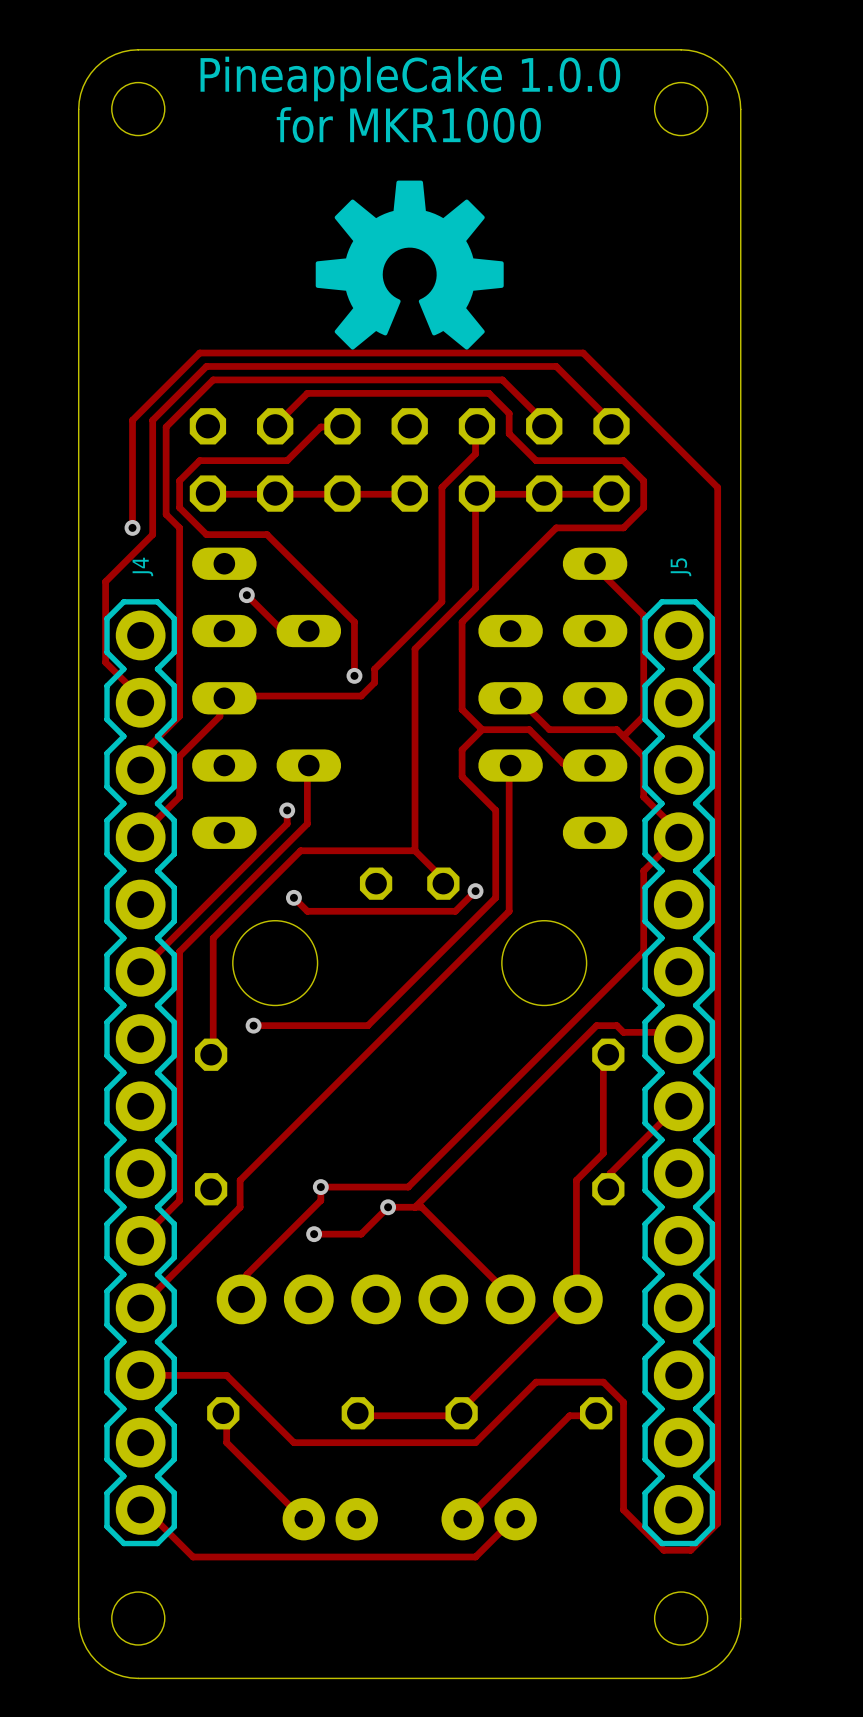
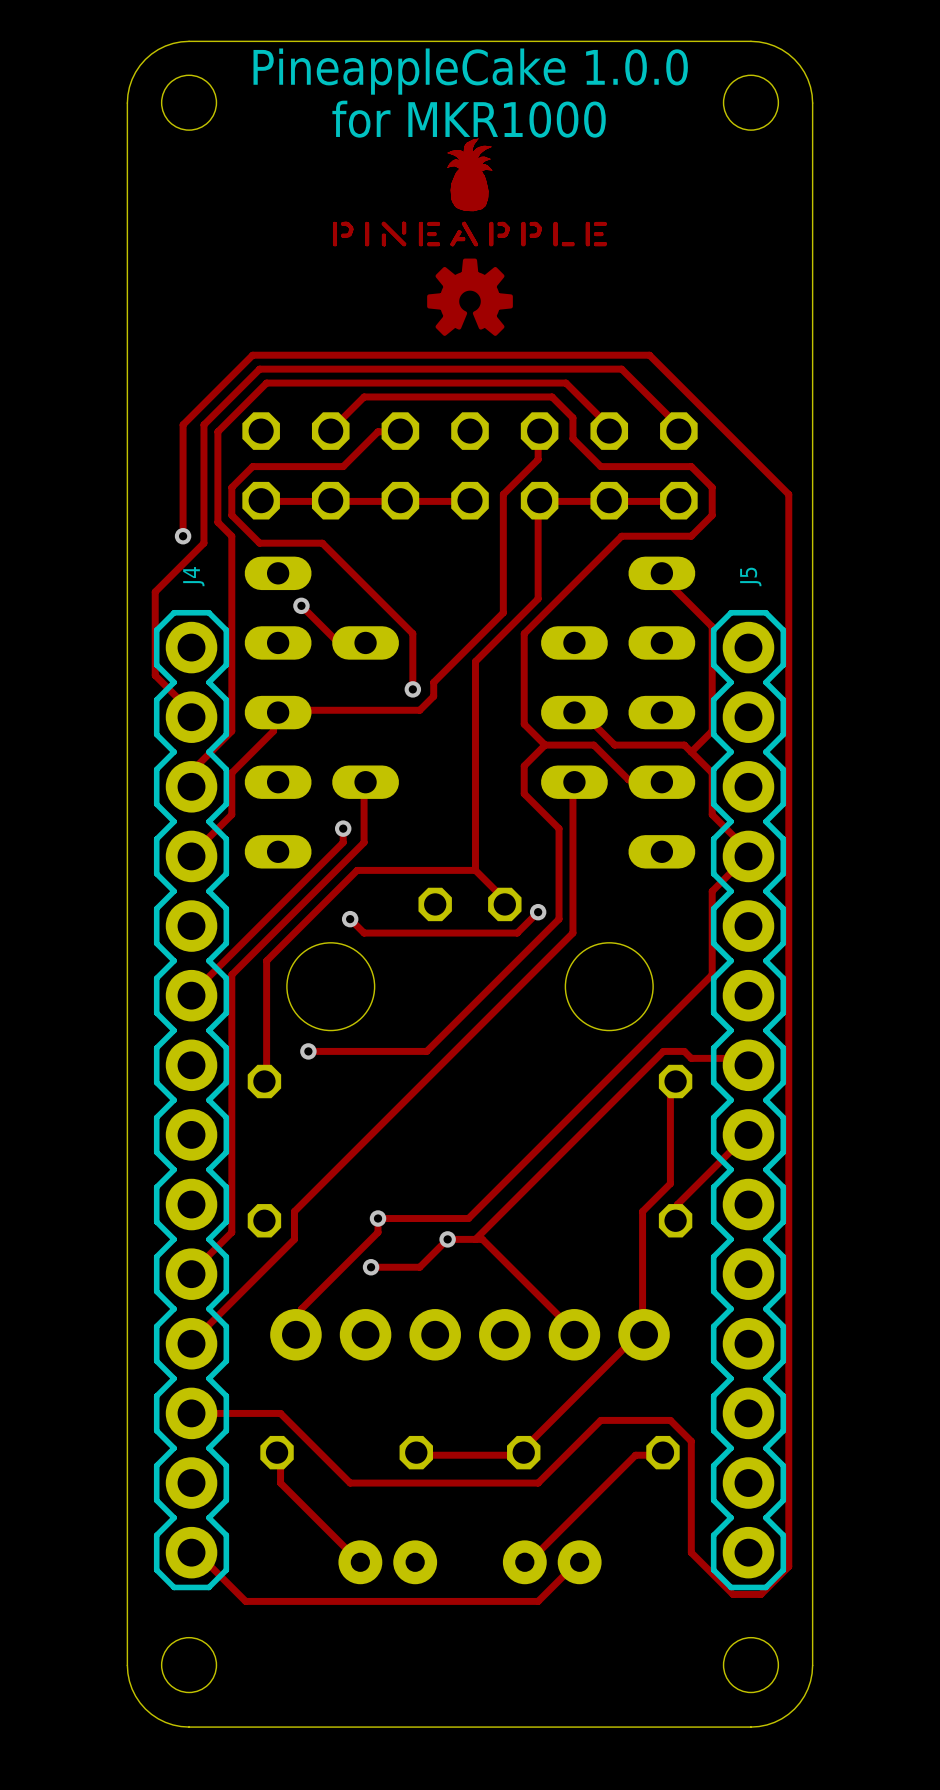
drawing: none -> [332, 138, 608, 336]
drawing: [315, 180, 504, 350] -> none

